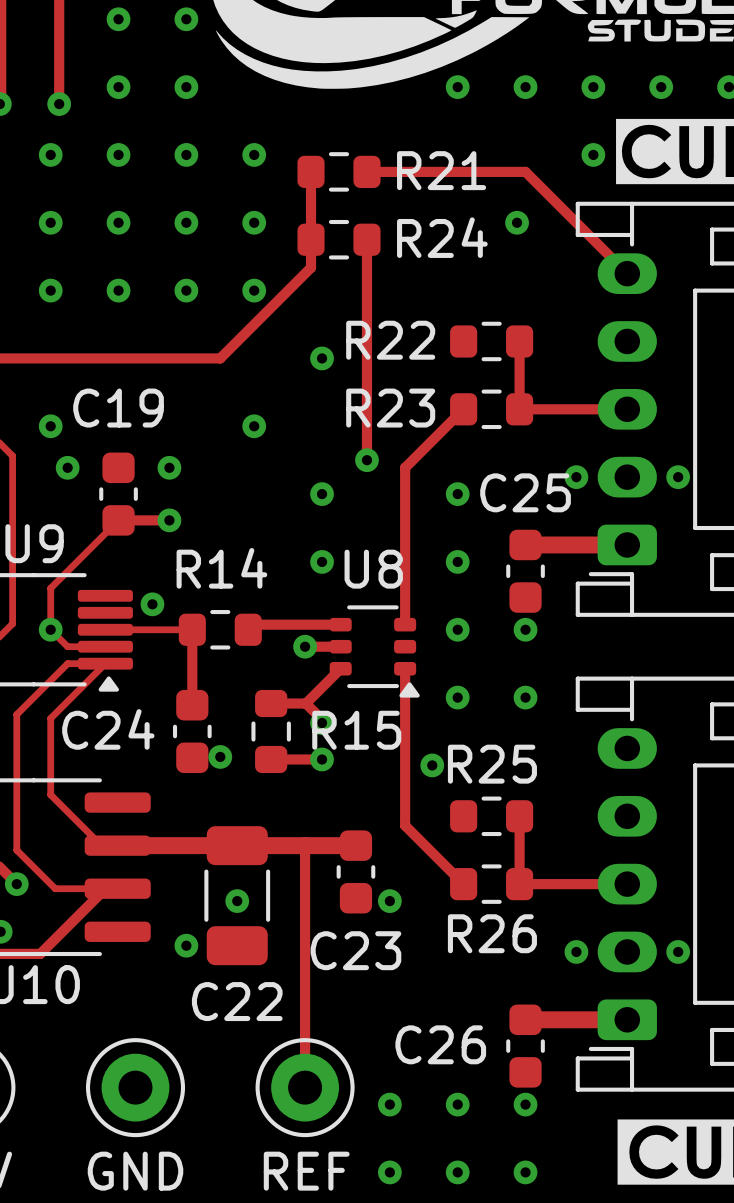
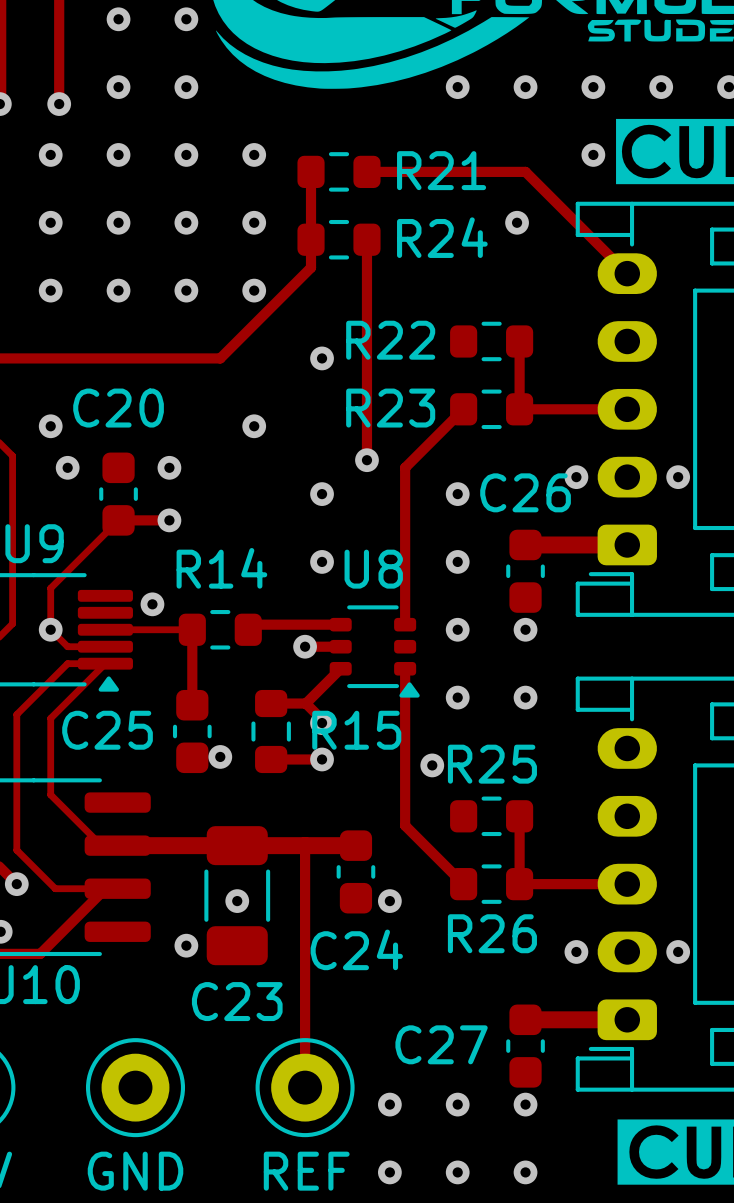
C19 name: C19 (118, 408) -> C20 (118, 408)
C25 name: C25 (525, 492) -> C26 (525, 492)
C24 name: C24 (108, 729) -> C25 (107, 730)
C23 name: C23 (355, 950) -> C24 (356, 949)
C22 name: C22 (237, 1001) -> C23 (237, 1001)
C26 name: C26 (440, 1044) -> C27 (441, 1044)

